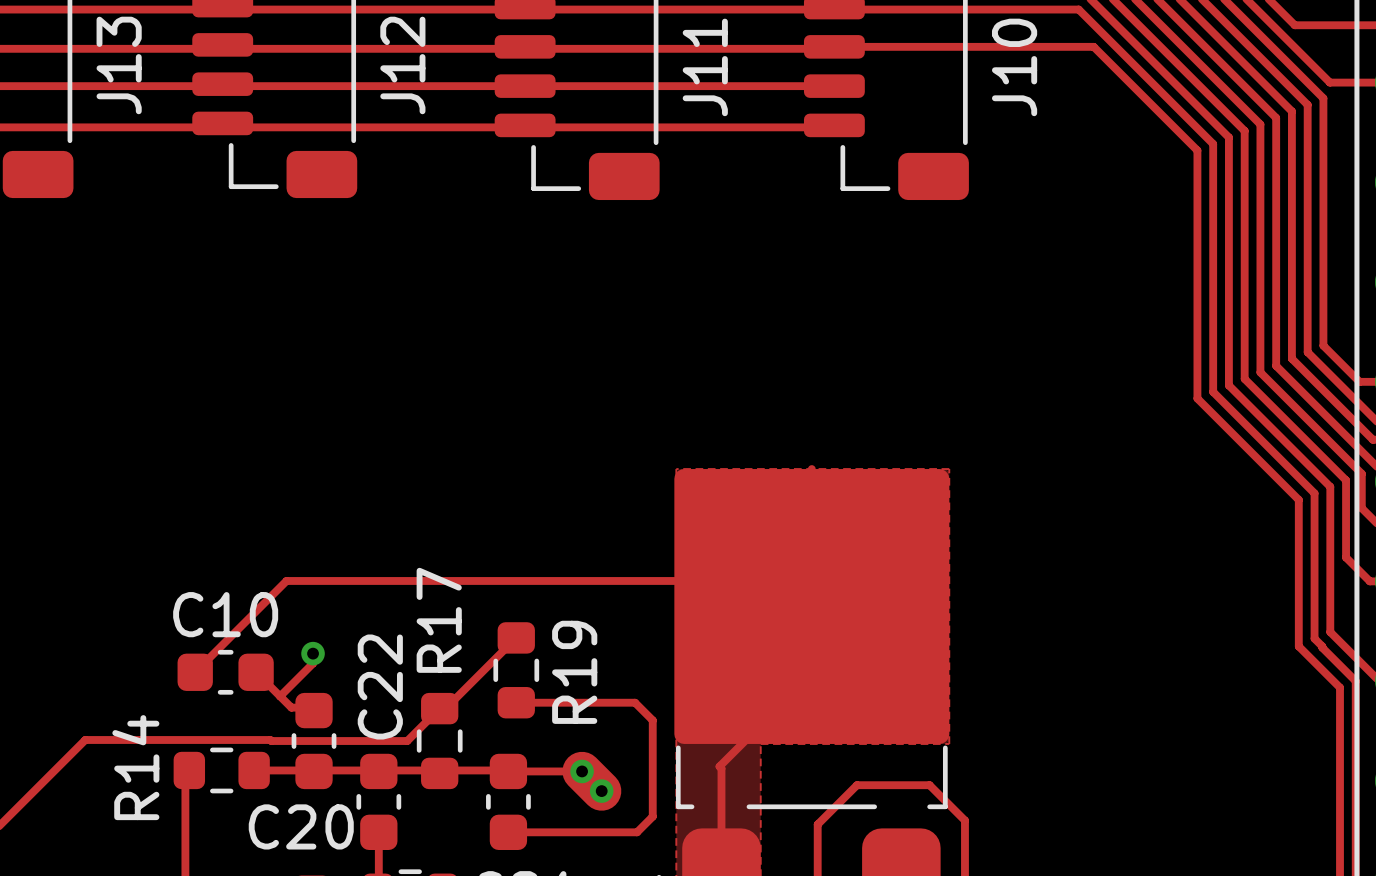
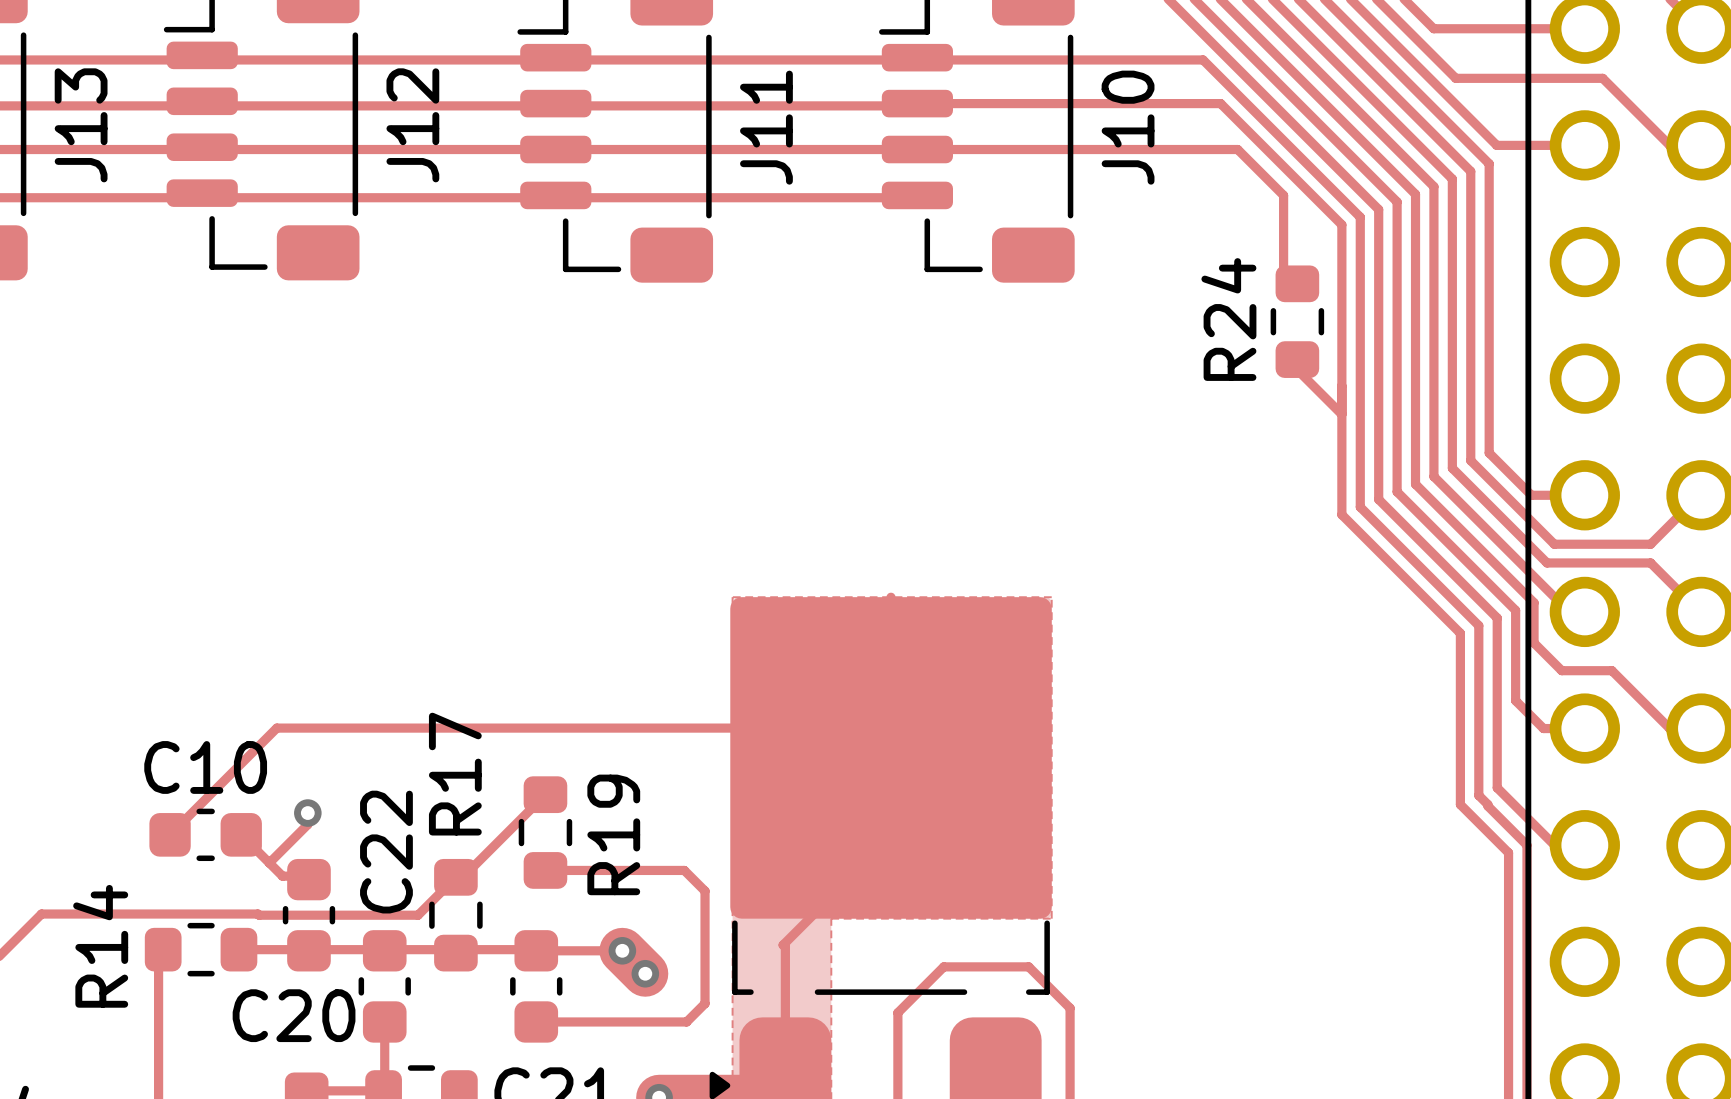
track: none -> (917, 149) (1237, 149) (1283, 195) (1283, 270) (1297, 283)
R24: none -> (1297, 321)
track: none -> (1297, 359) (1297, 369) (1341, 414)

